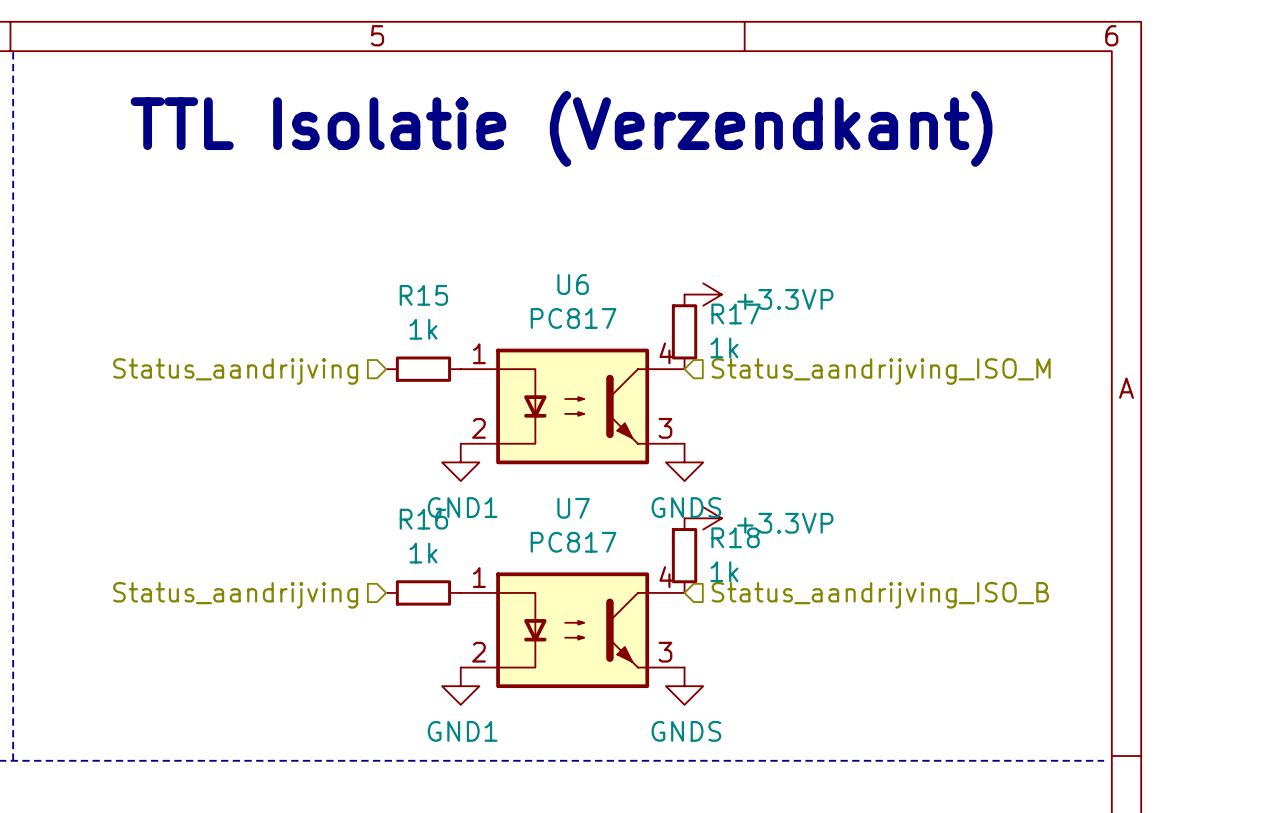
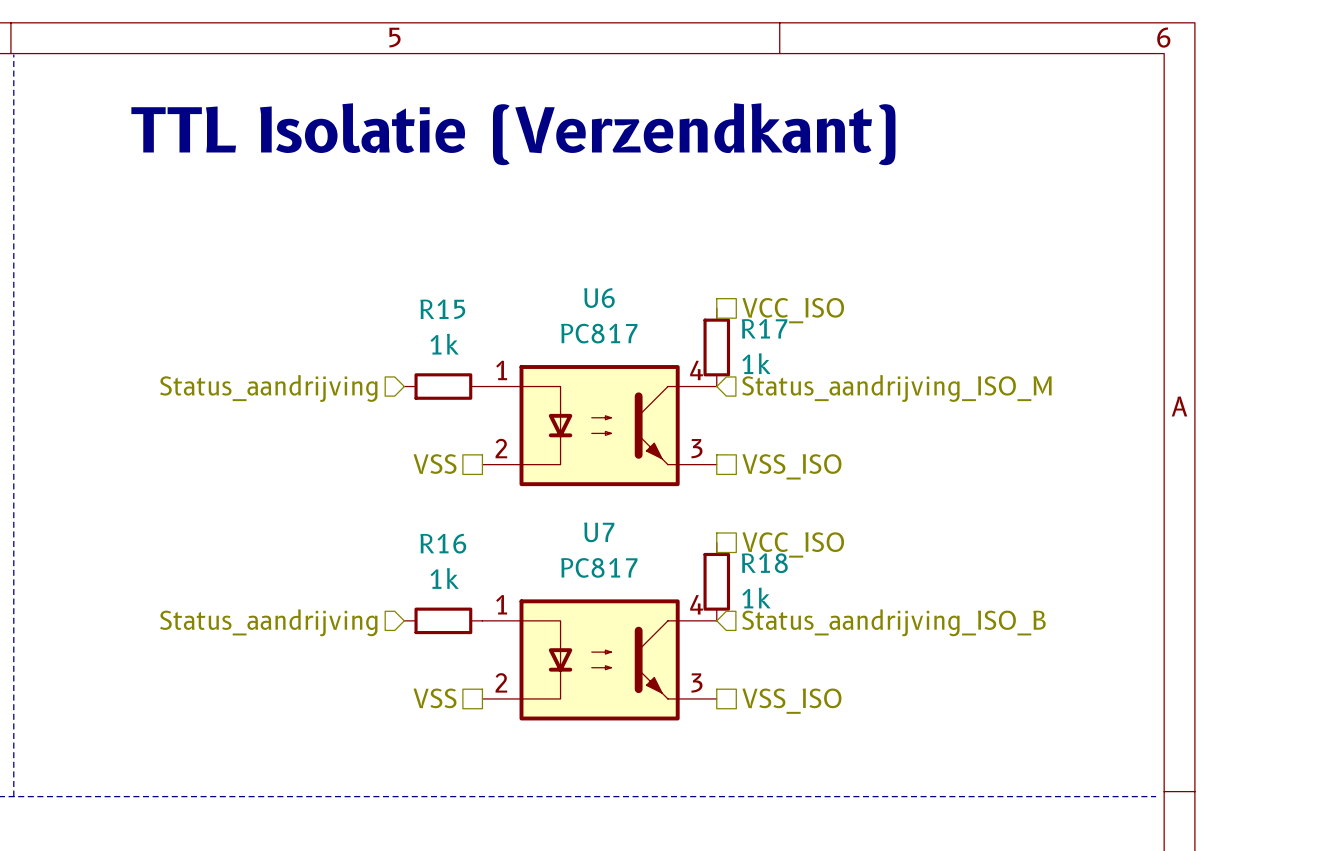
power symbol: +3.3VP (703, 294) -> none
hierarchical label: none -> VCC_ISO (793, 310)
hierarchical label: none -> VSS (435, 464)
hierarchical label: none -> VSS_ISO (791, 466)
power symbol: GND1 (460, 462) -> none
power symbol: GNDS (684, 462) -> none
power symbol: +3.3VP (703, 518) -> none
hierarchical label: none -> VCC_ISO (793, 544)
hierarchical label: none -> VSS (435, 698)
hierarchical label: none -> VSS_ISO (791, 701)
power symbol: GND1 (460, 686) -> none
power symbol: GNDS (684, 686) -> none

